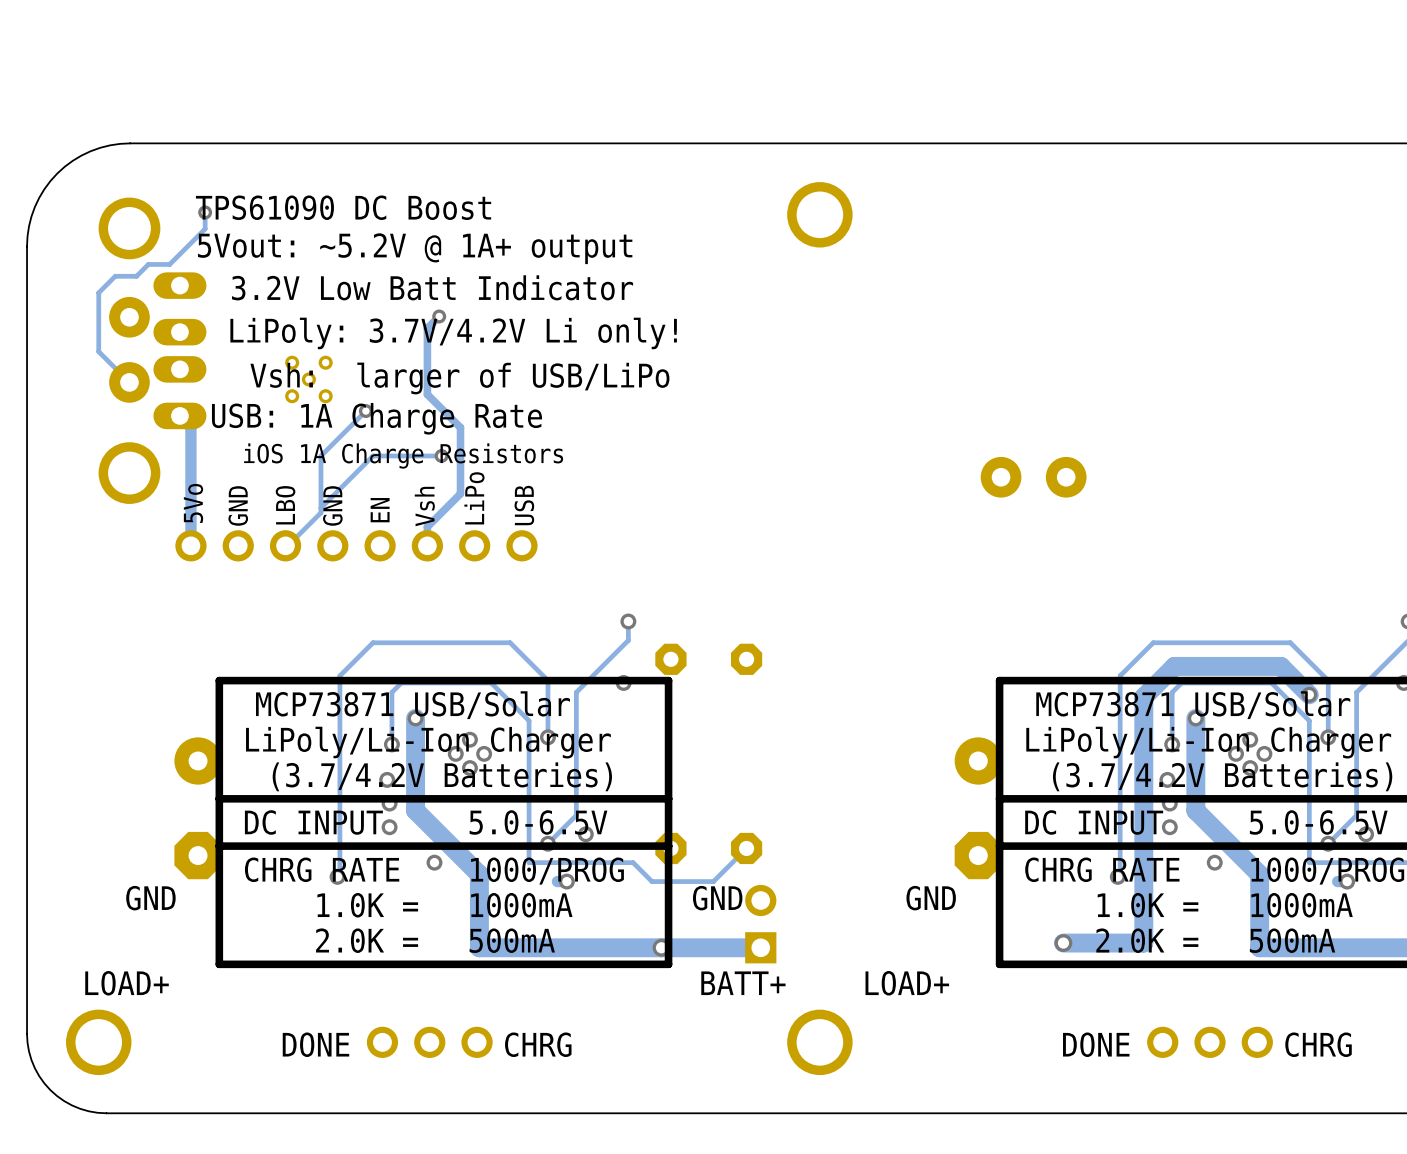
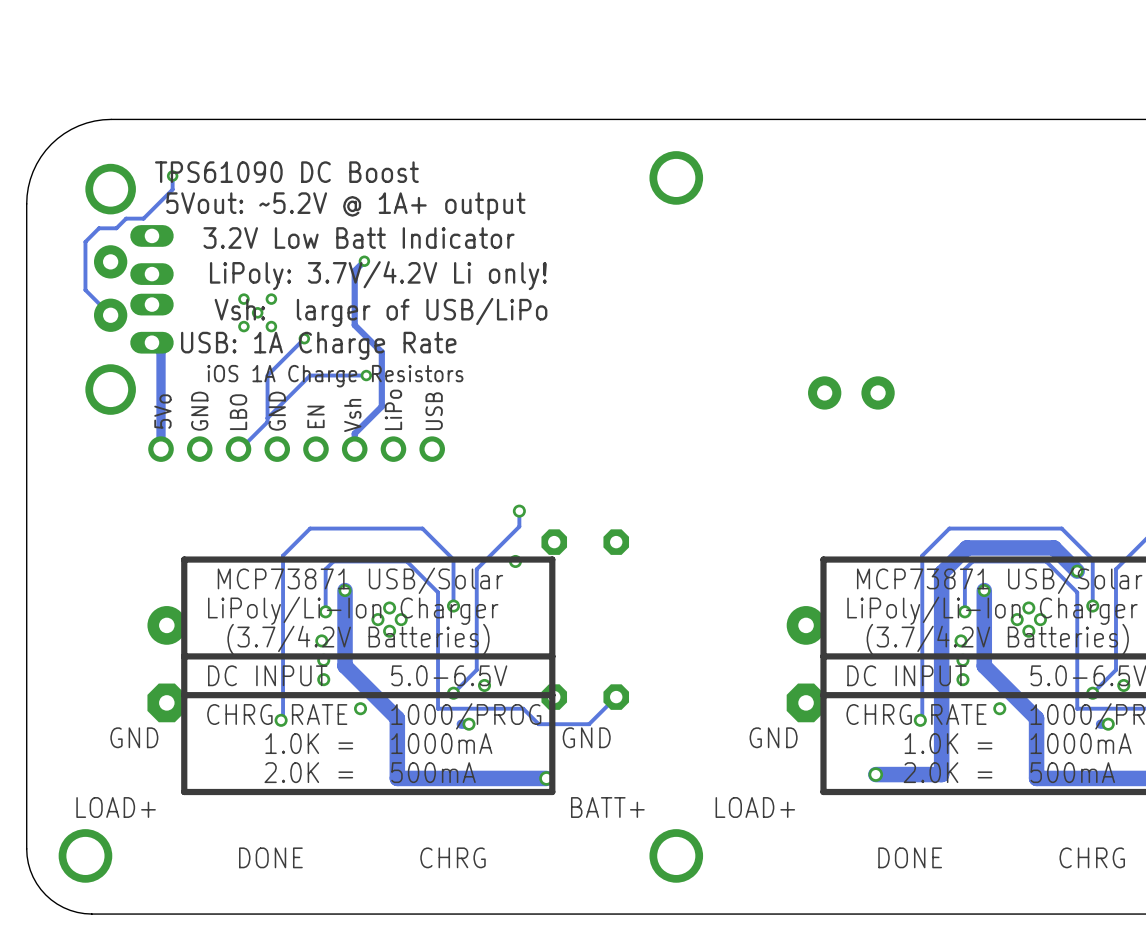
part: (760, 924) -> none
track: (760, 947) (661, 947) -> none
part: (429, 1042) -> none
part: (1210, 1042) -> none

